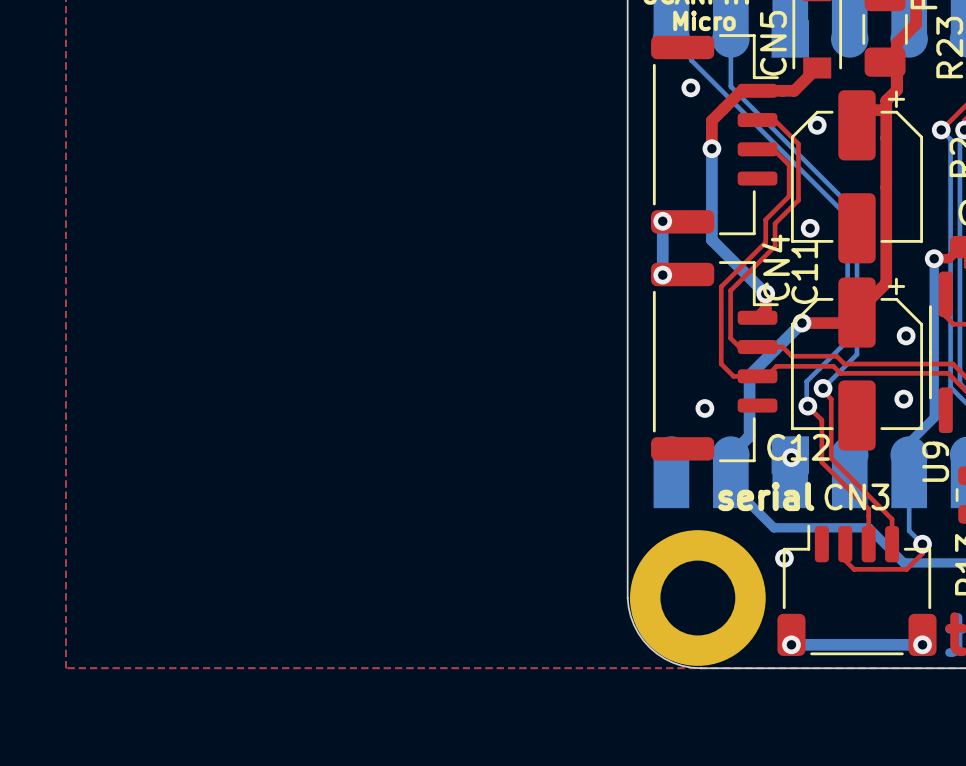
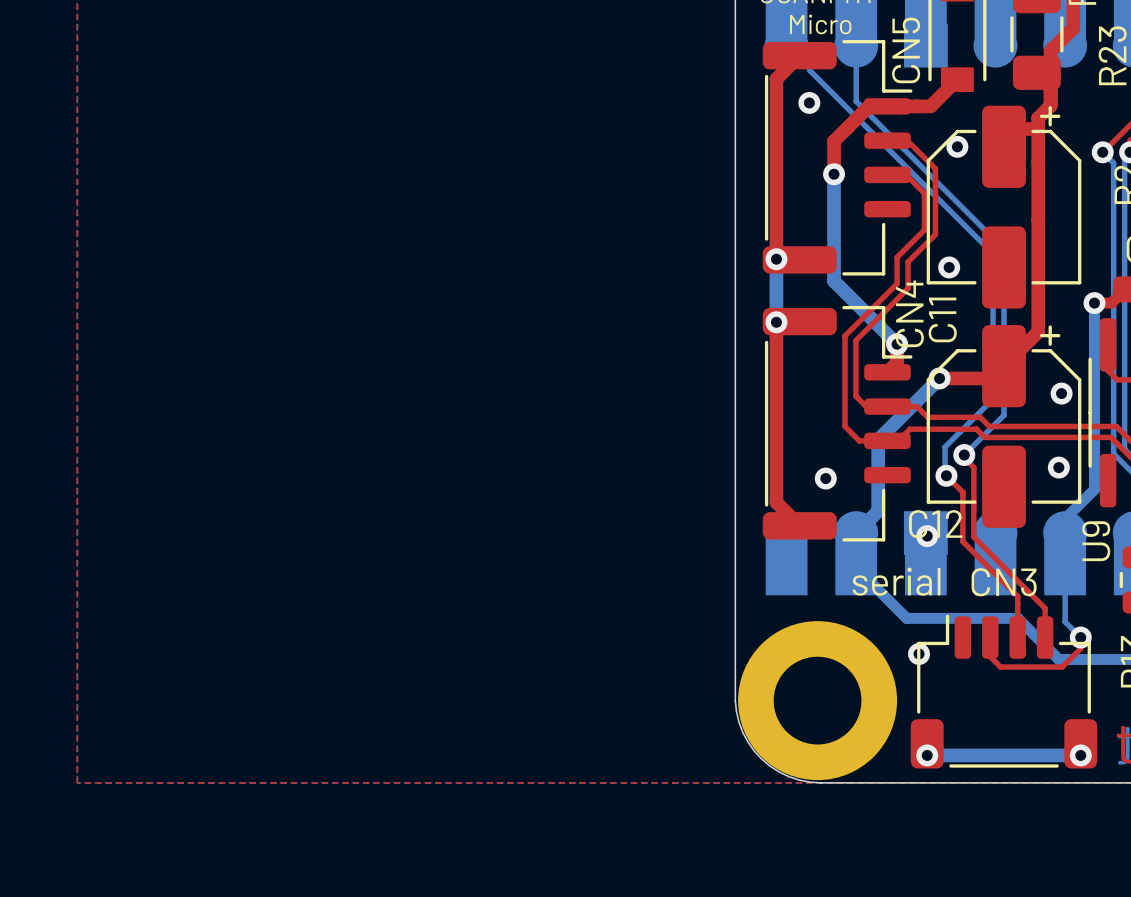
top track: none -> (799, 55) (776, 78) (776, 259)
top track: none -> (776, 322) (776, 502) (799, 525)

